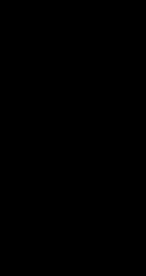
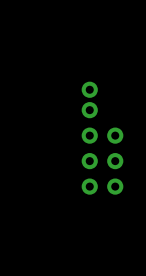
via: none -> (89, 89)
via: none -> (89, 110)
via: none -> (89, 135)
via: none -> (115, 135)
via: none -> (89, 161)
via: none -> (115, 161)
via: none -> (89, 186)
via: none -> (115, 186)

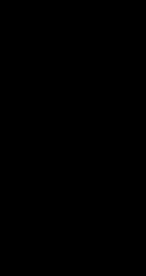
via: (89, 89) -> none
via: (89, 110) -> none
via: (89, 135) -> none
via: (115, 135) -> none
via: (89, 161) -> none
via: (115, 161) -> none
via: (89, 186) -> none
via: (115, 186) -> none

